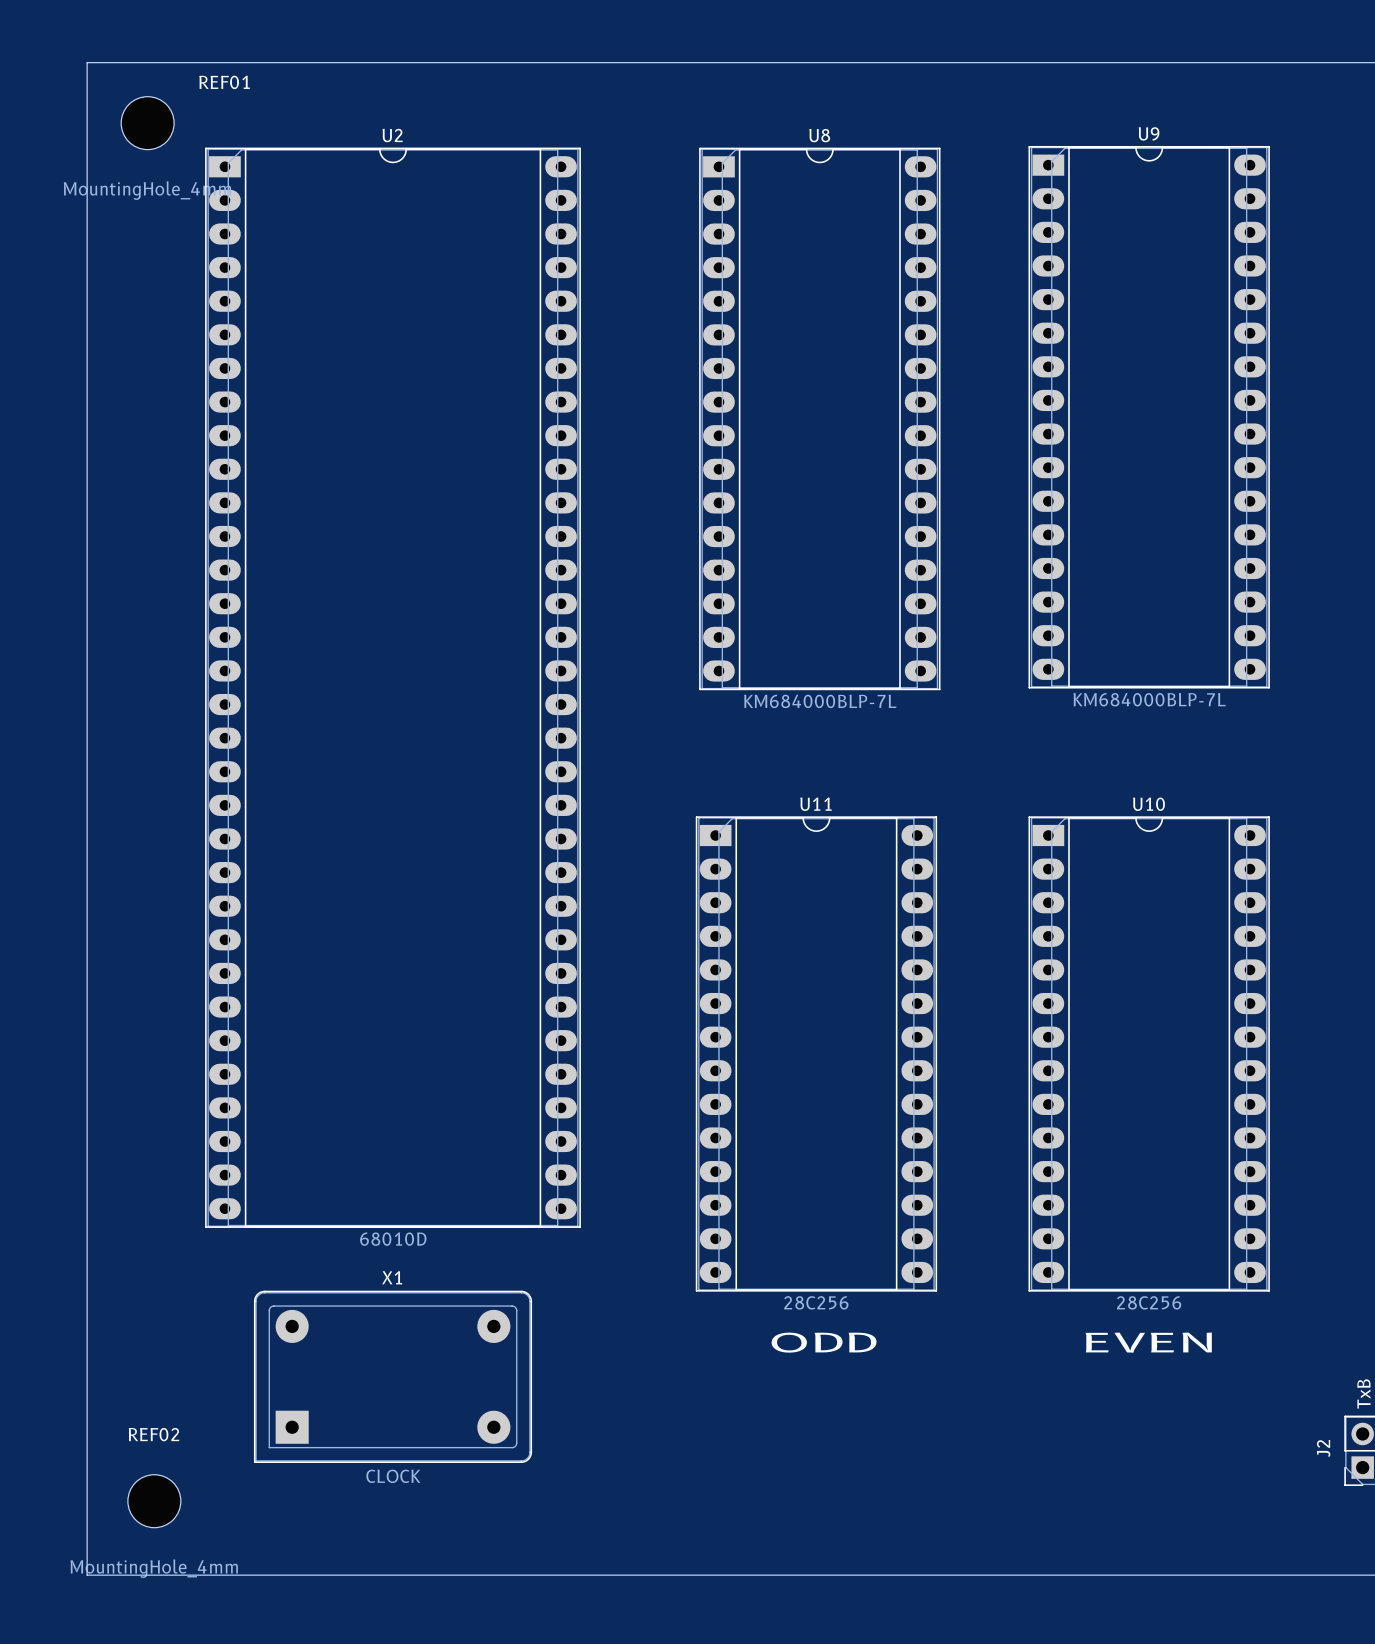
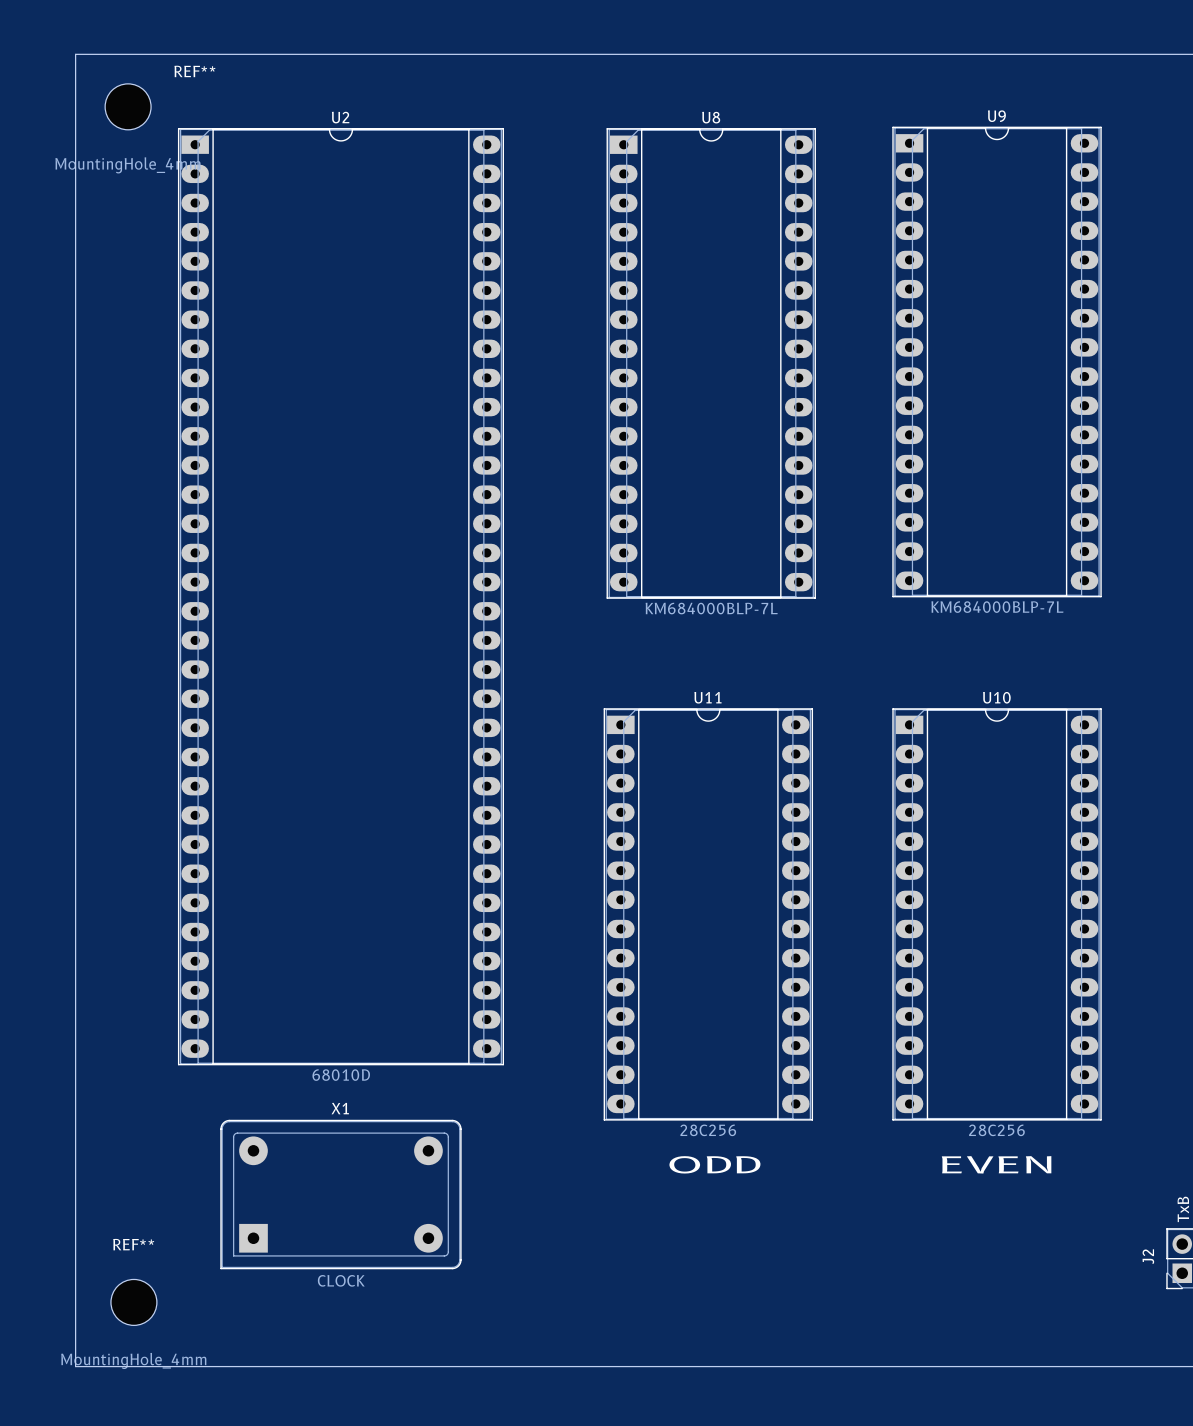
REF01 name: REF01 (224, 82) -> REF** (194, 71)
REF02 name: REF02 (153, 1434) -> REF** (133, 1244)

